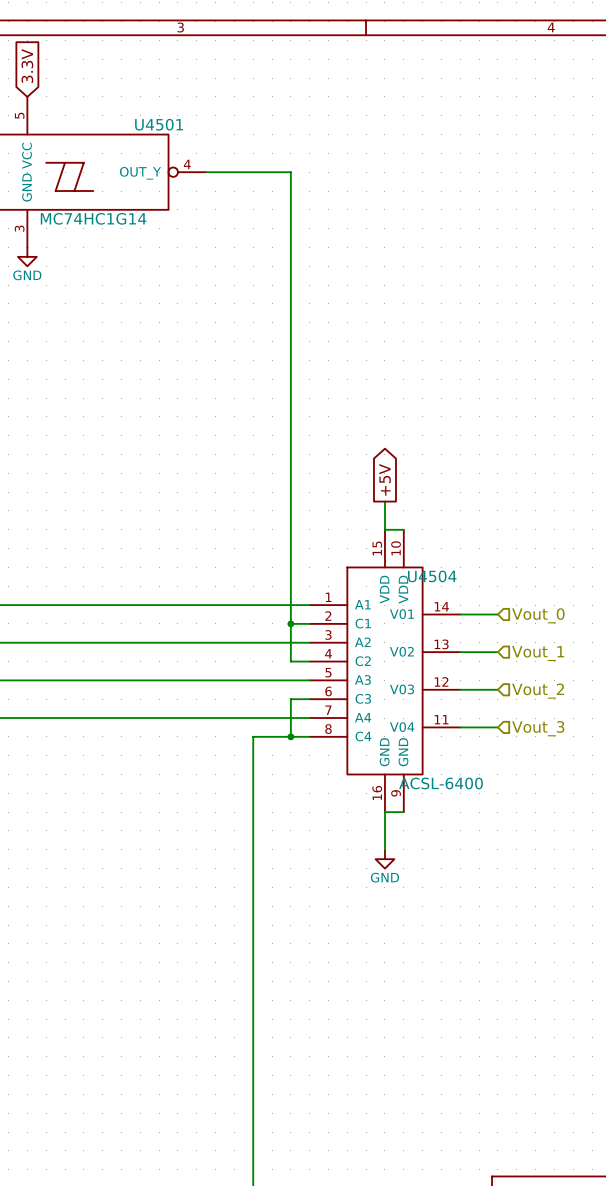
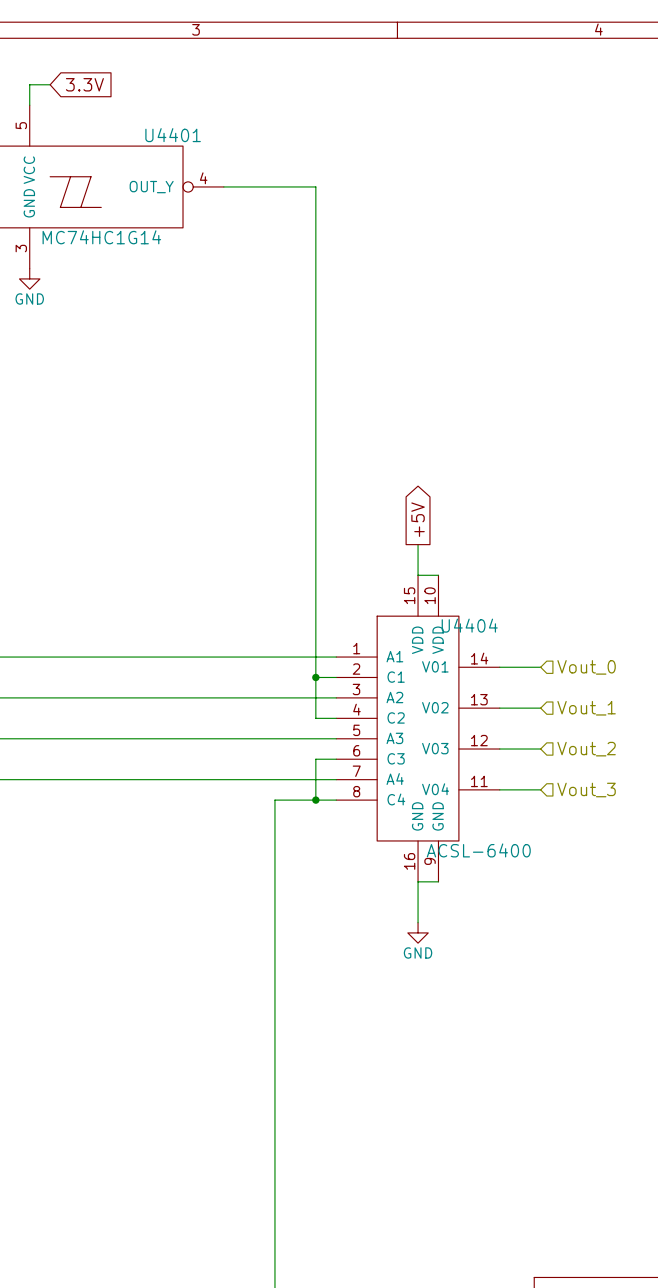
global label rotation: 0° (27, 66) -> 90° clockwise (84, 84)
wire: none -> (50, 84) (29, 84) (29, 105)
U4501 name: U4501 (159, 124) -> U4401 (173, 135)
U4504 name: U4504 (432, 576) -> U4404 (469, 625)

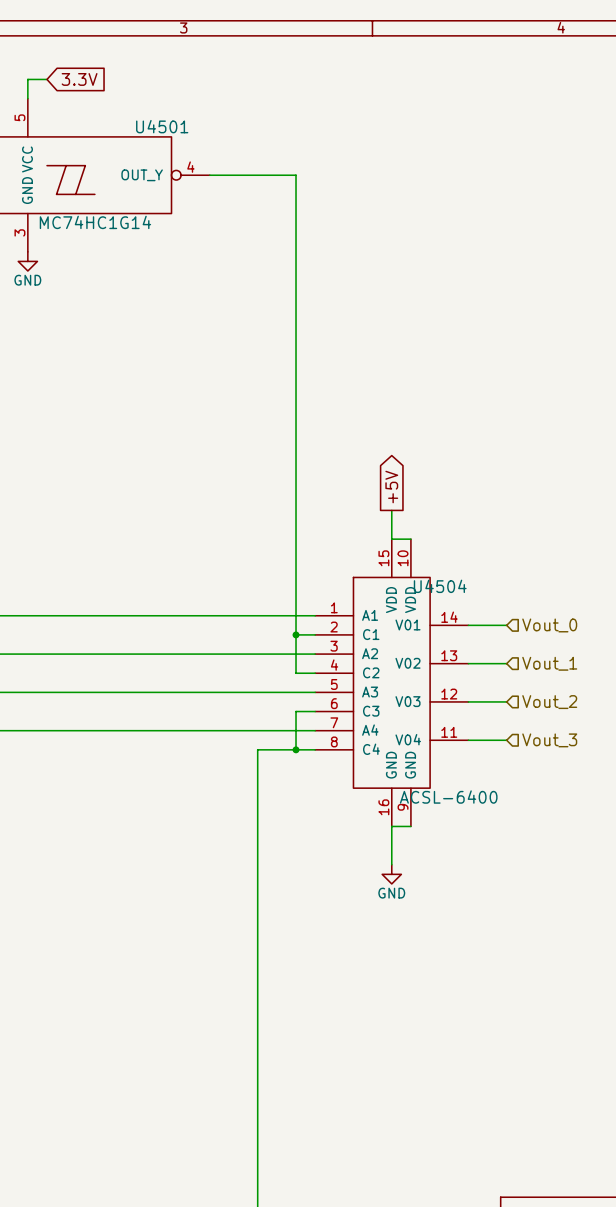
U4401 name: U4401 (173, 135) -> U4501 (162, 126)
U4404 name: U4404 (469, 625) -> U4504 (440, 586)

